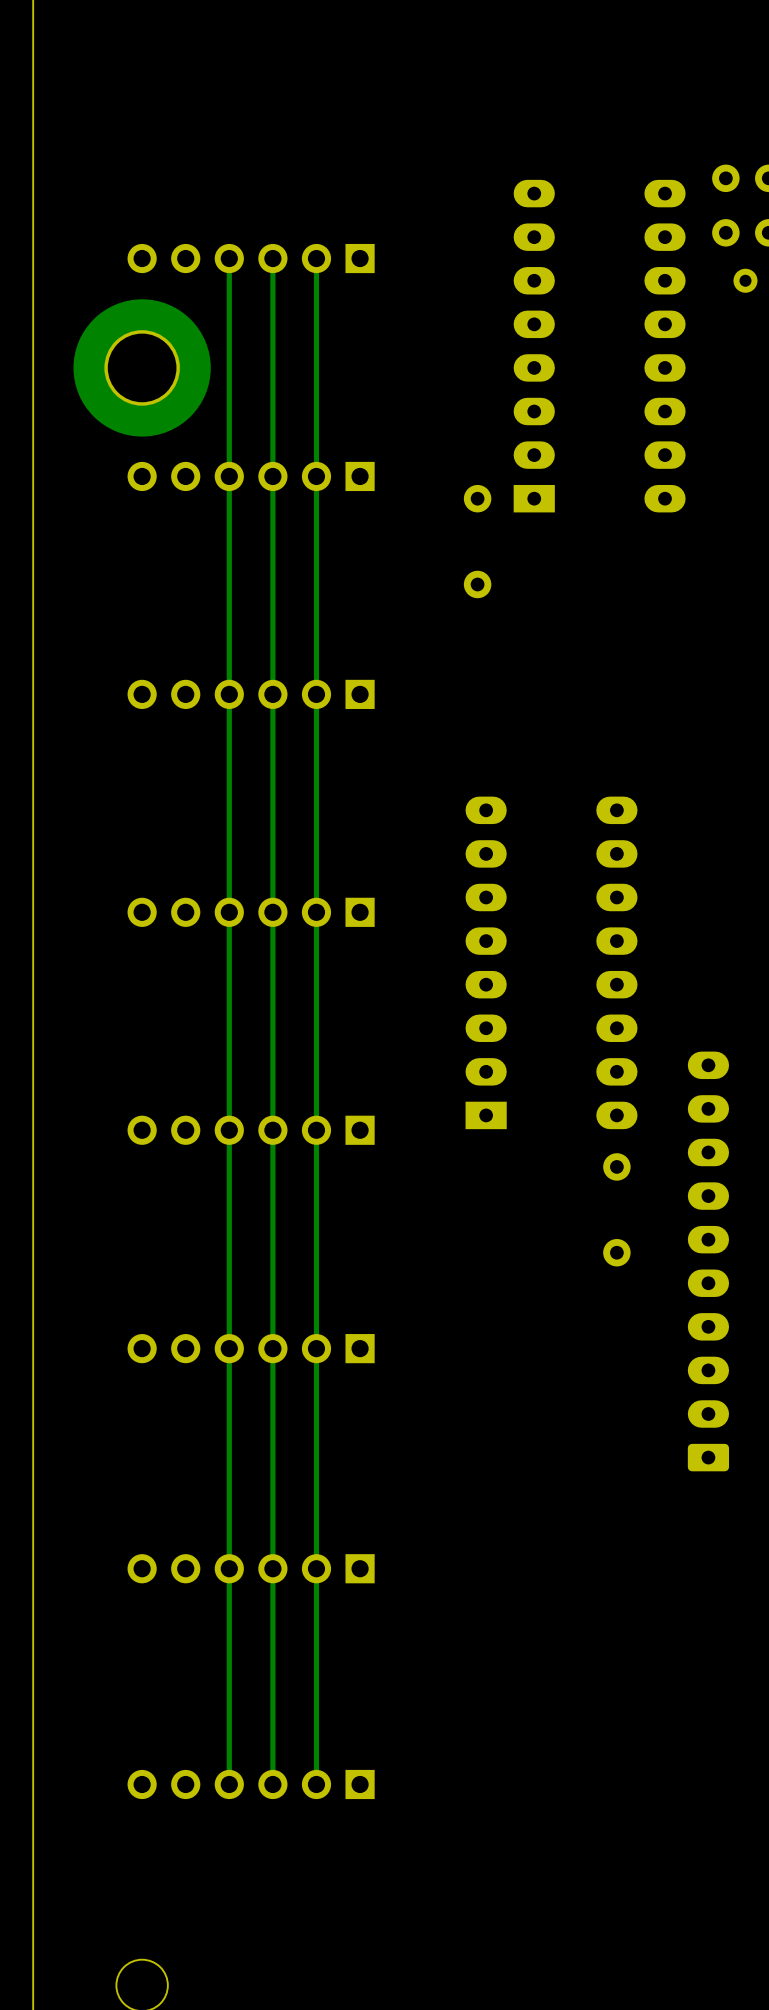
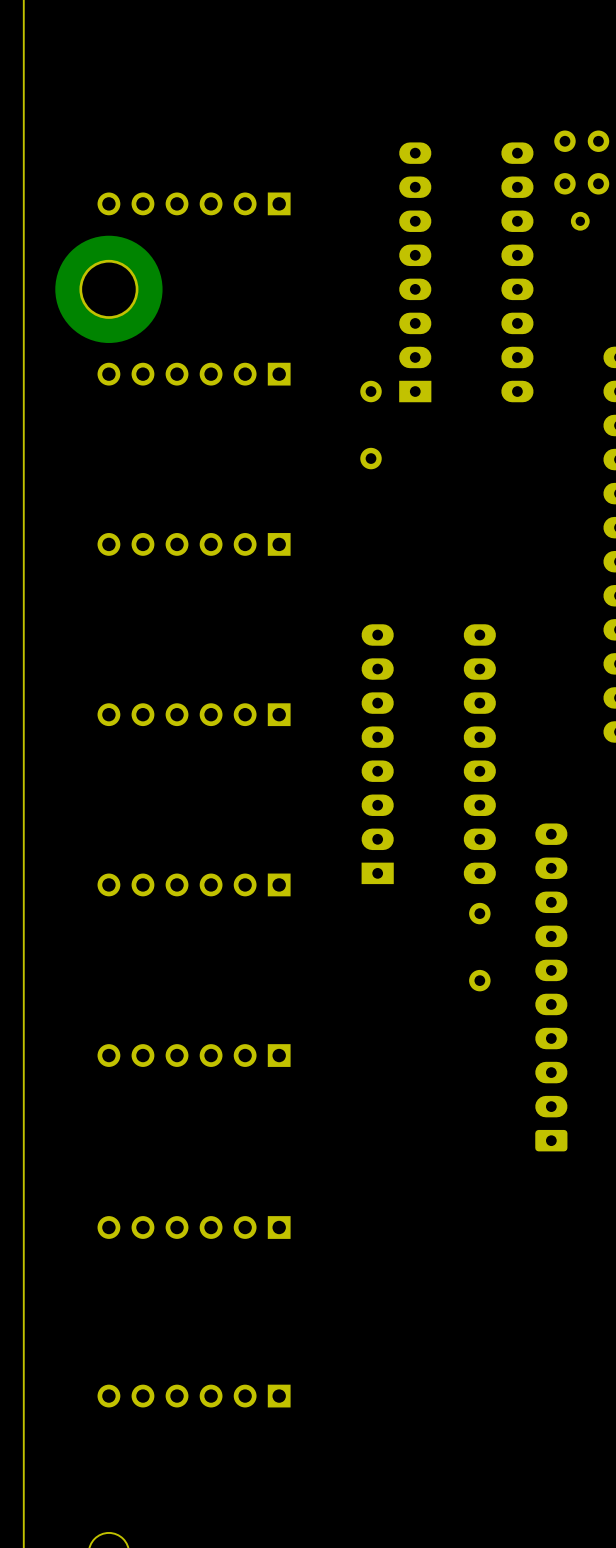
track: (229, 258) (229, 1784) -> none
track: (272, 258) (272, 1784) -> none
track: (316, 258) (316, 1784) -> none

